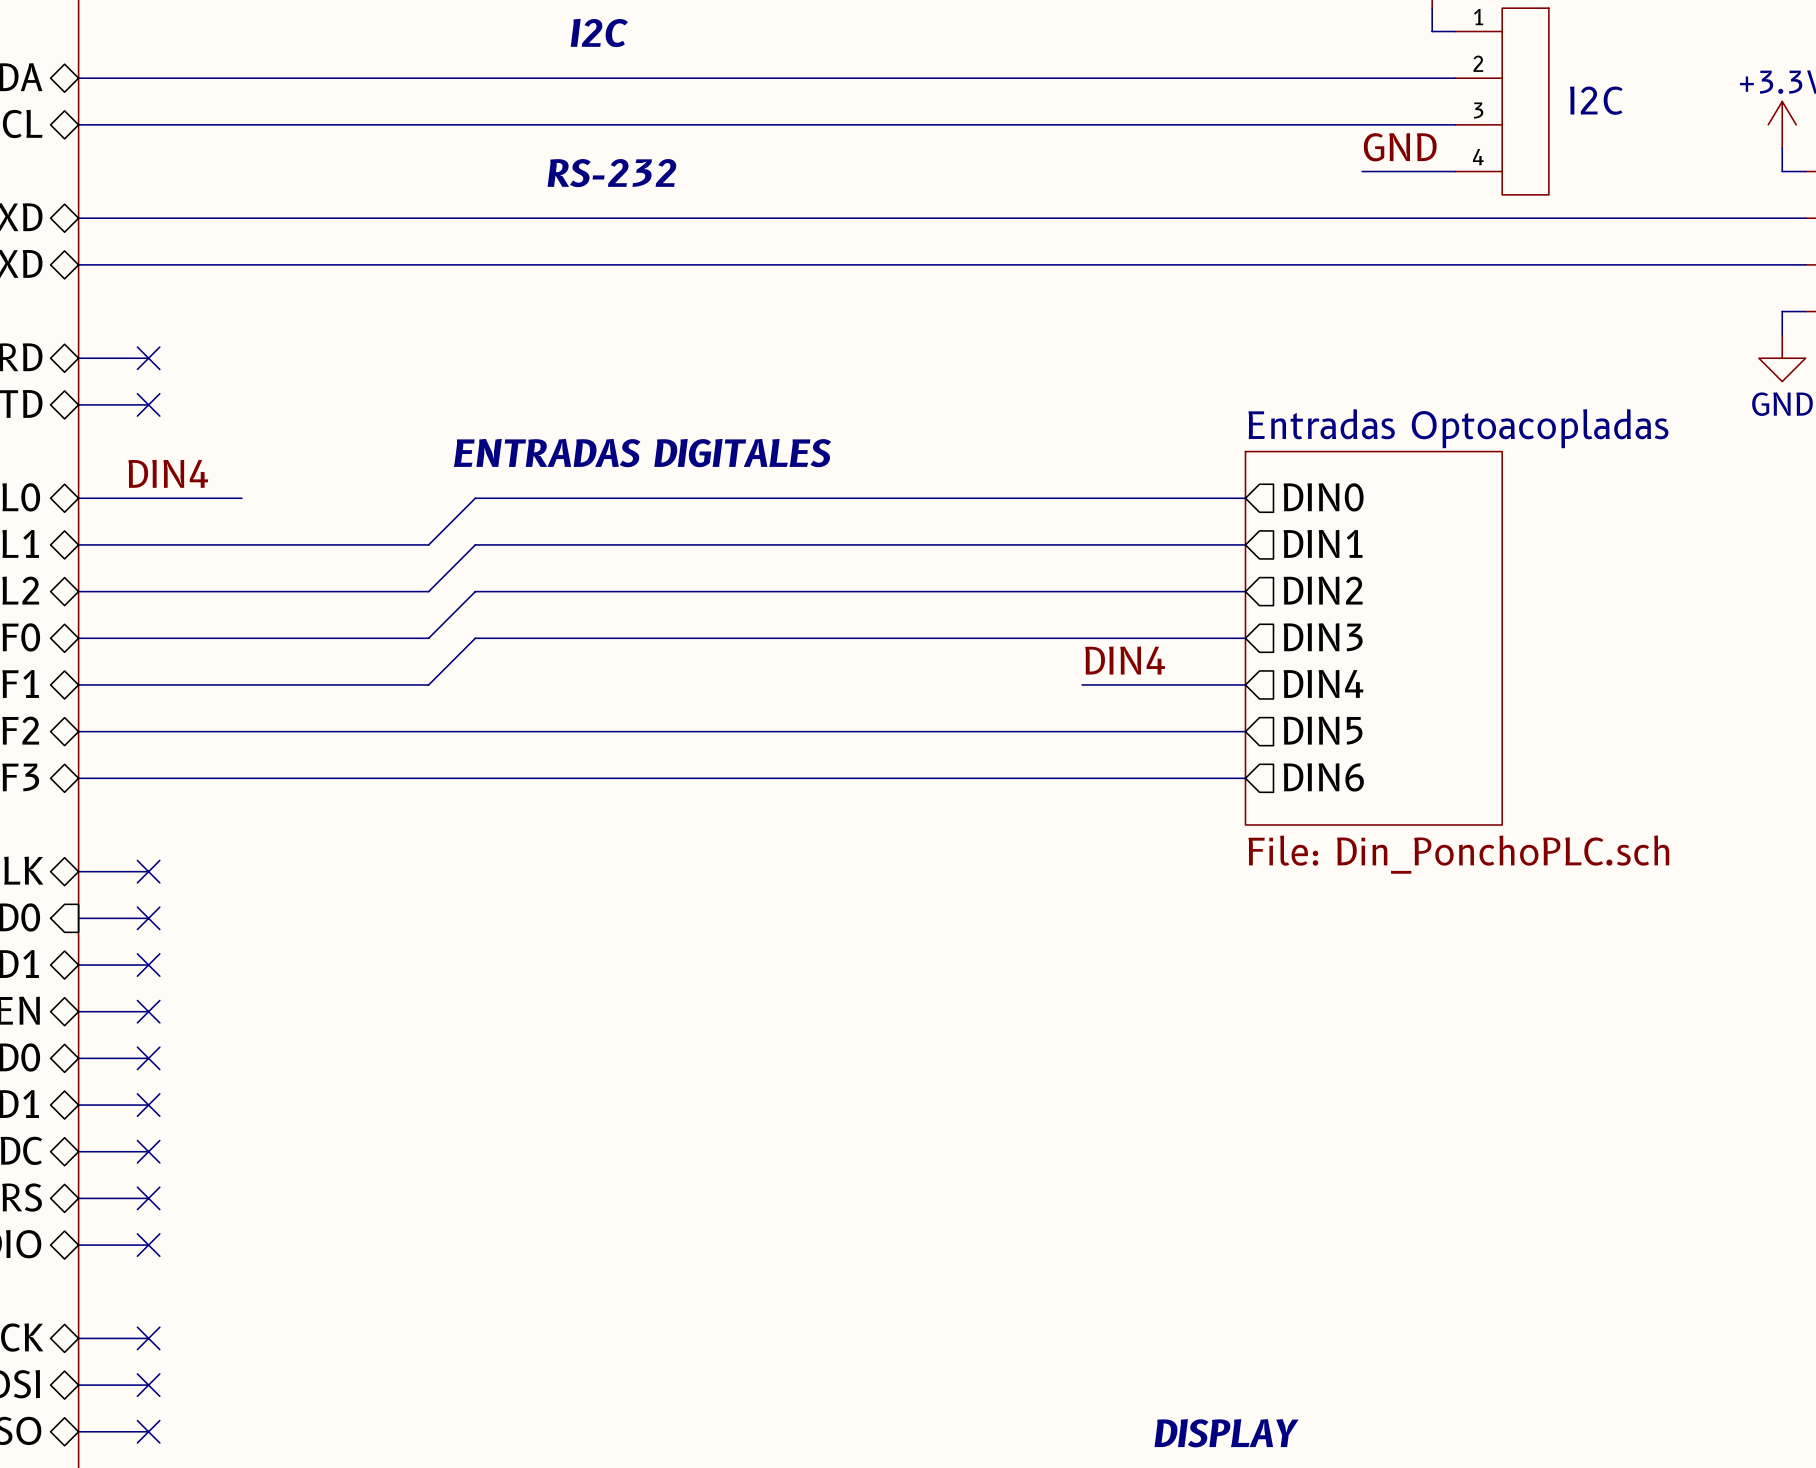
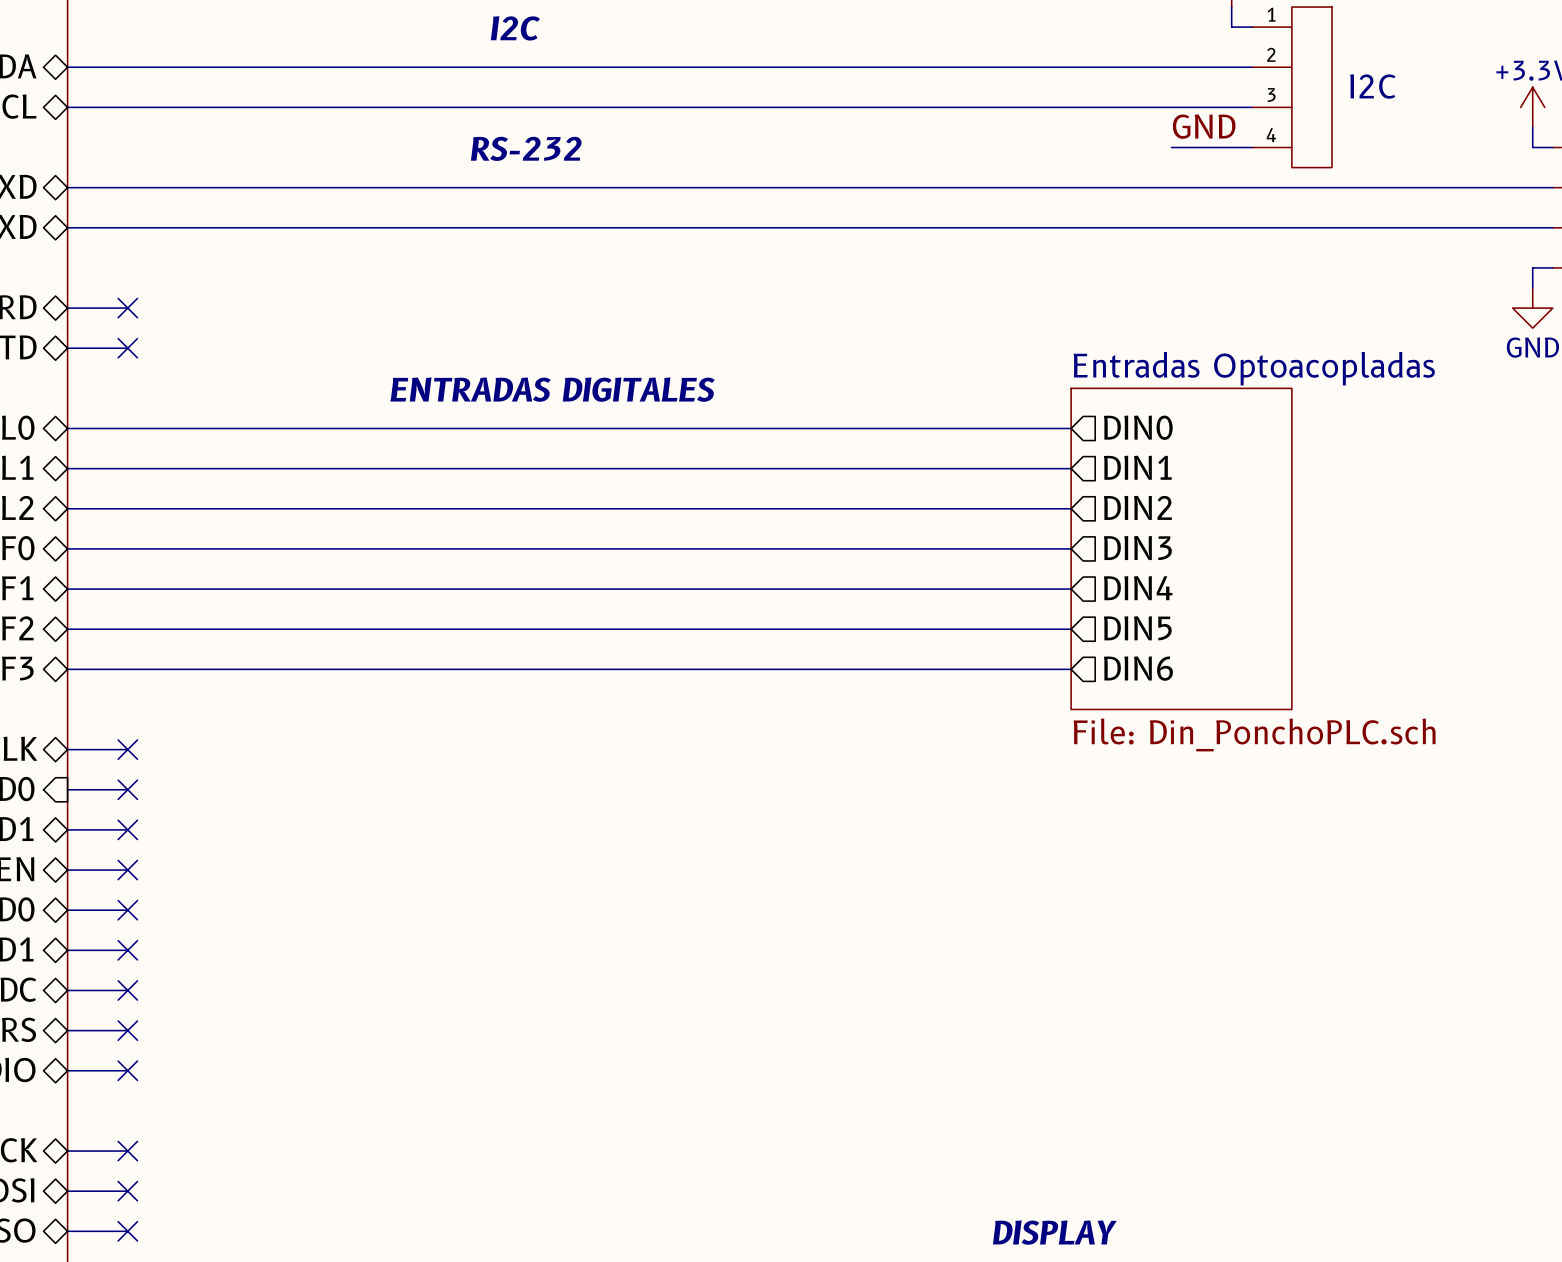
label: DIN4 (168, 473) -> none
wire: none -> (208, 428) (408, 428)
wire: (475, 498) (428, 544) -> (408, 468) (368, 468)
wire: (475, 544) (428, 591) -> none
wire: (475, 591) (428, 638) -> (408, 508) (368, 508)
wire: (475, 638) (428, 684) -> (408, 548) (368, 548)
label: DIN4 (1125, 660) -> none
wire: none -> (368, 589) (930, 589)

